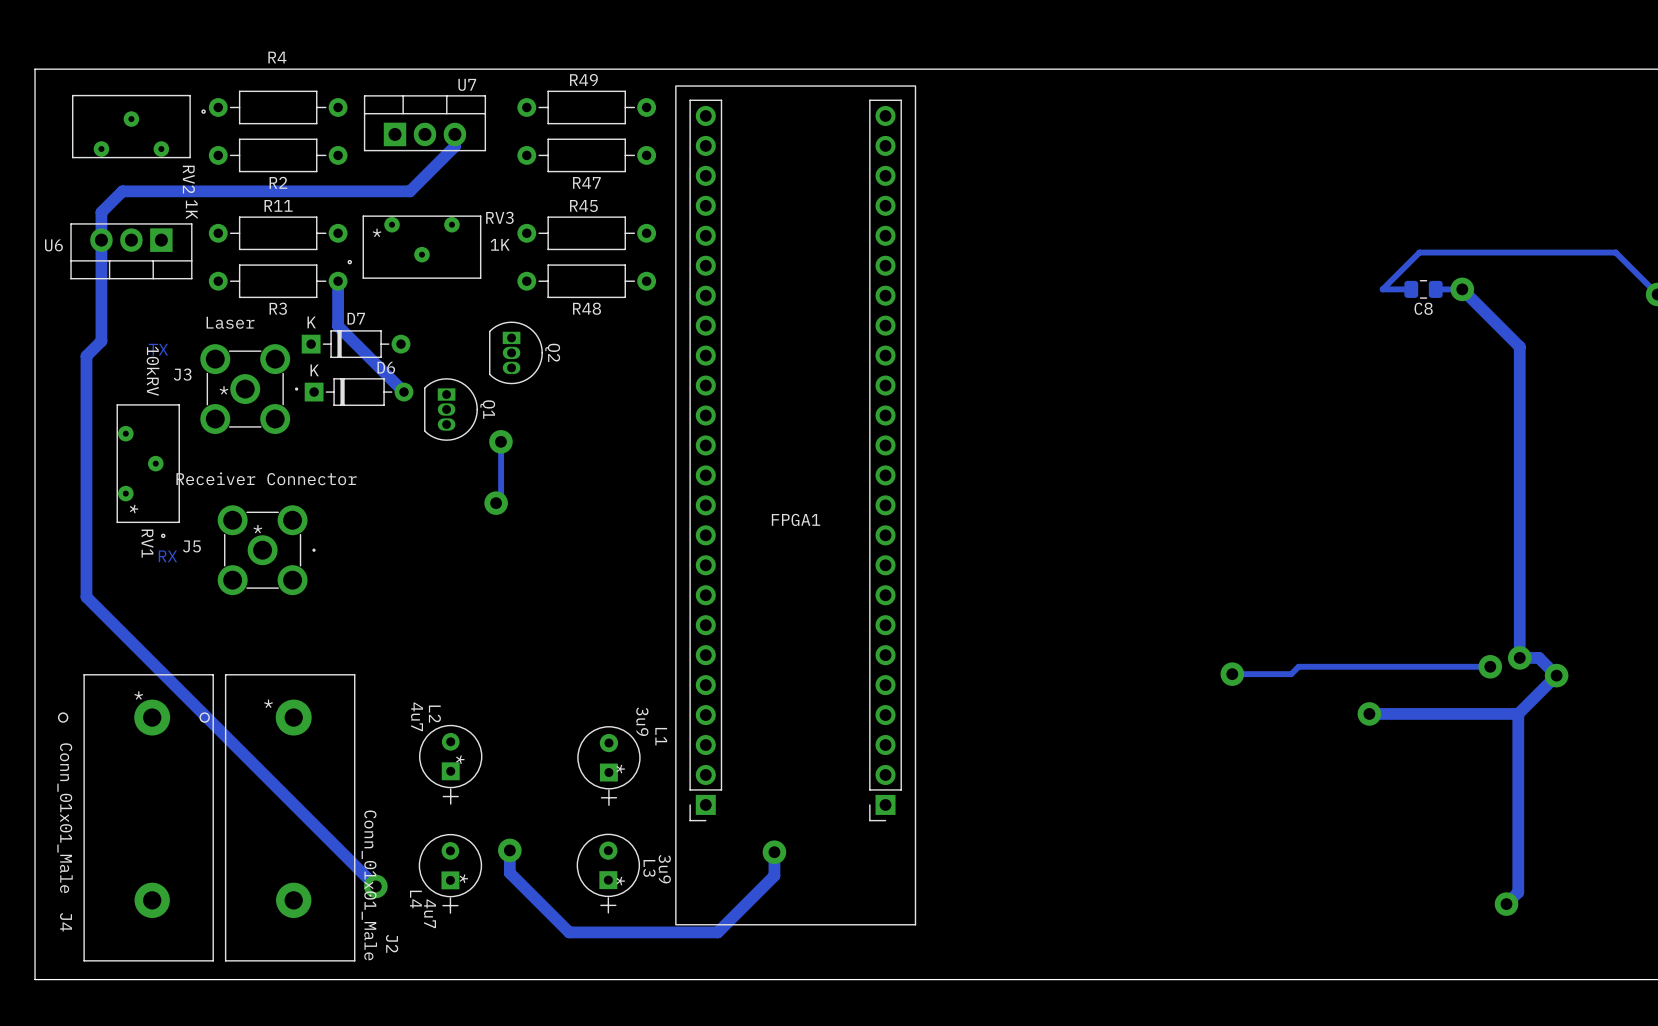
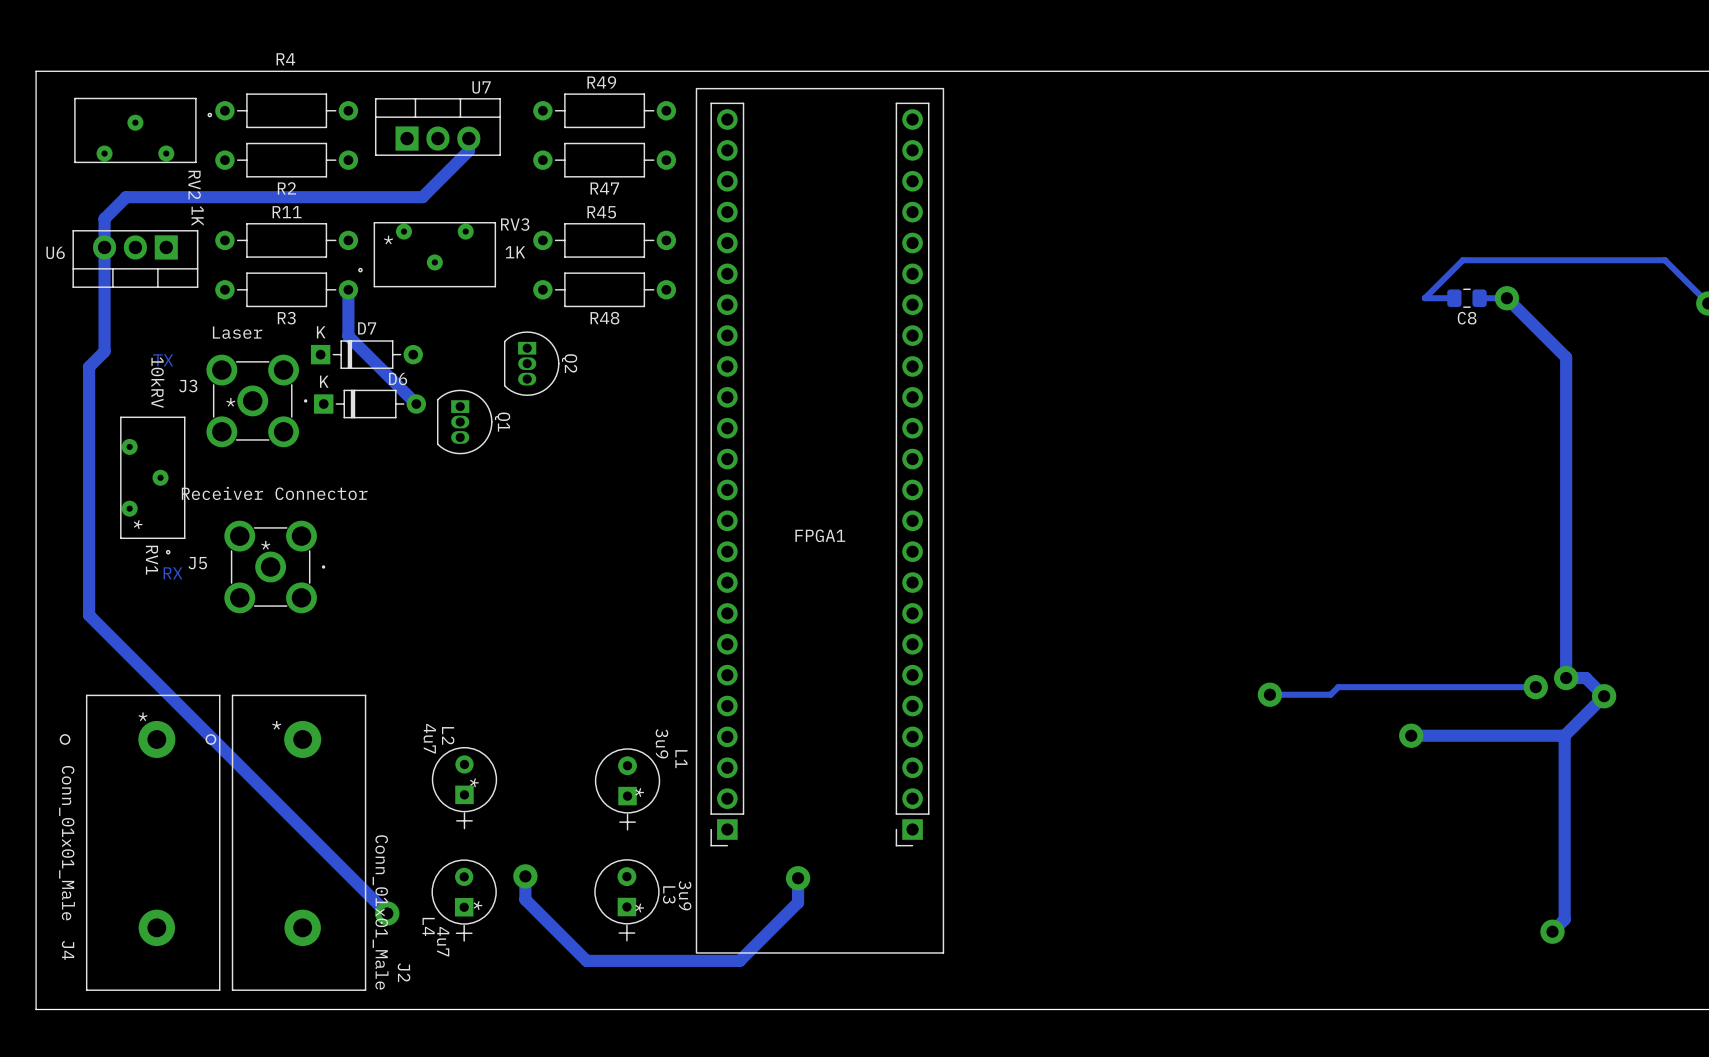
via: (500, 441) -> none
track: (501, 441) (501, 498) (496, 503) -> none
via: (496, 503) -> none

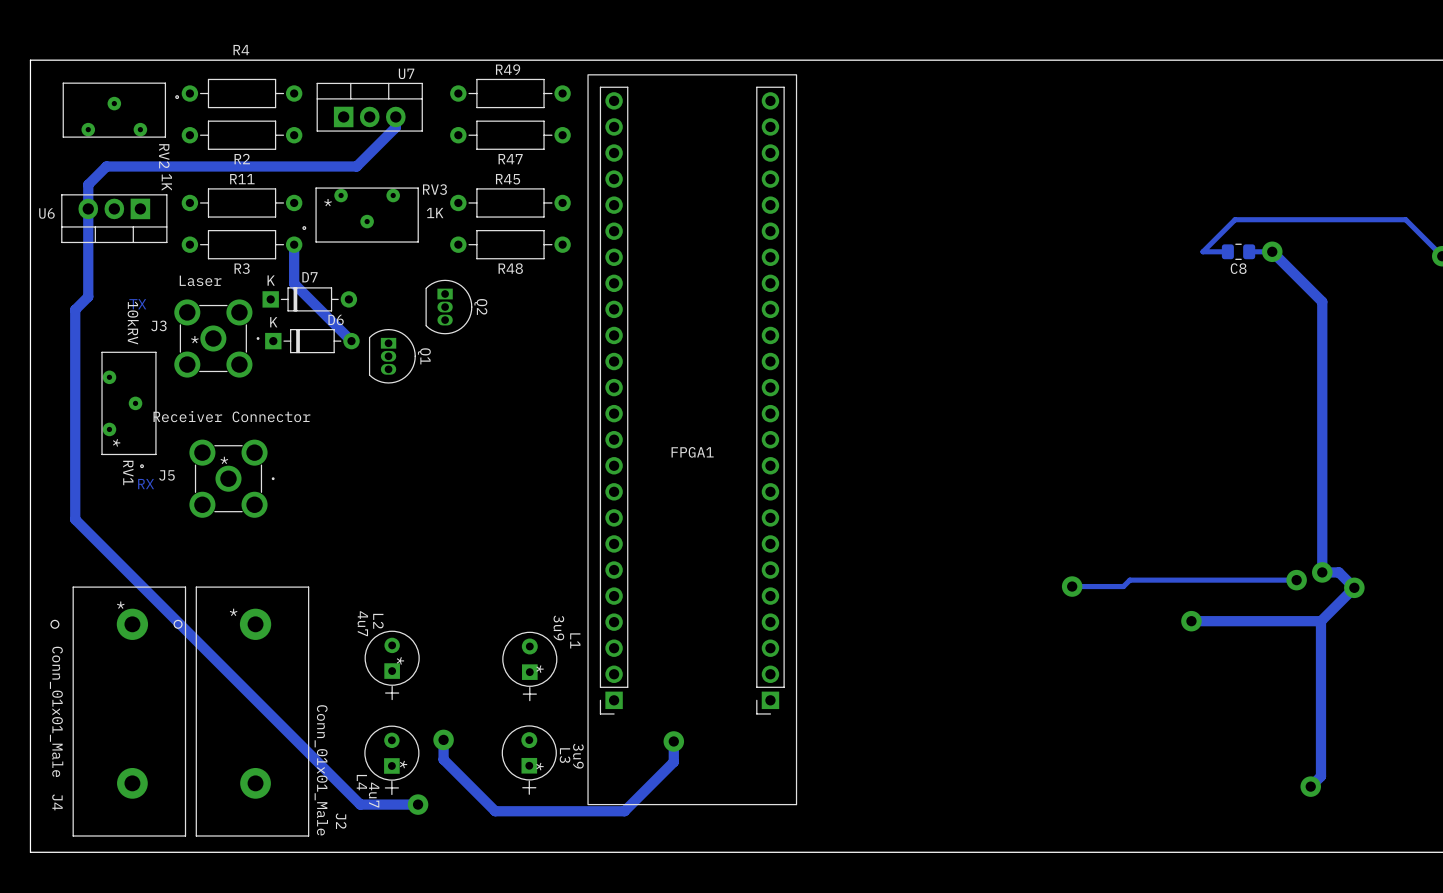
track: none -> (326, 771) (360, 804) (418, 804)
via: (387, 913) -> none
via: none -> (418, 804)

